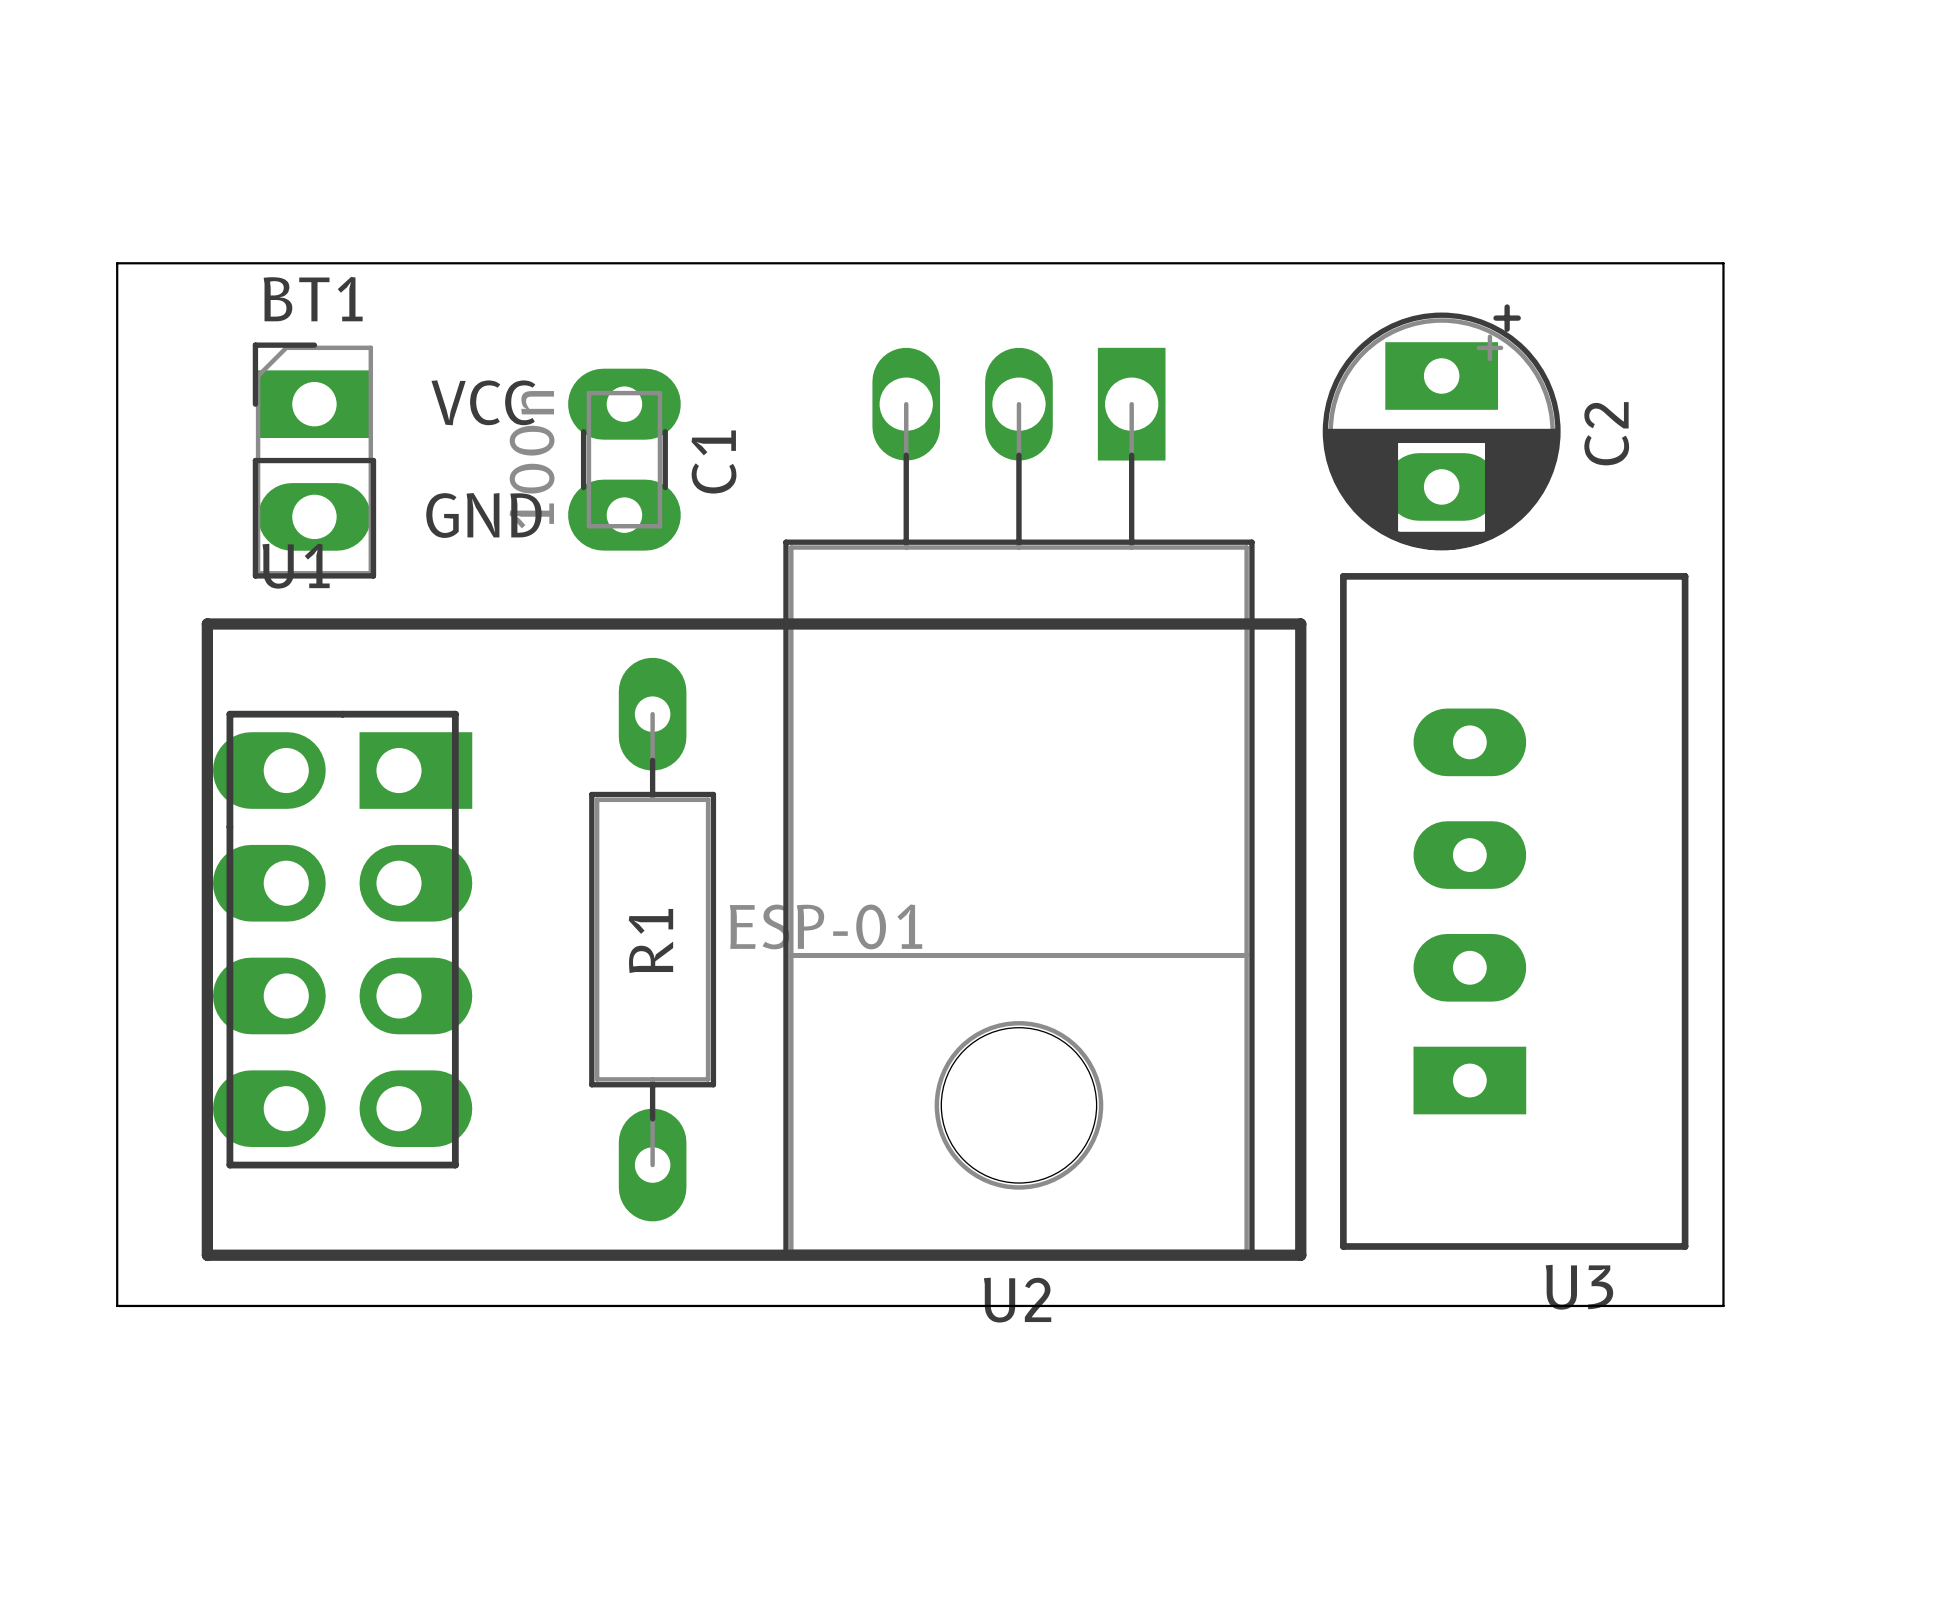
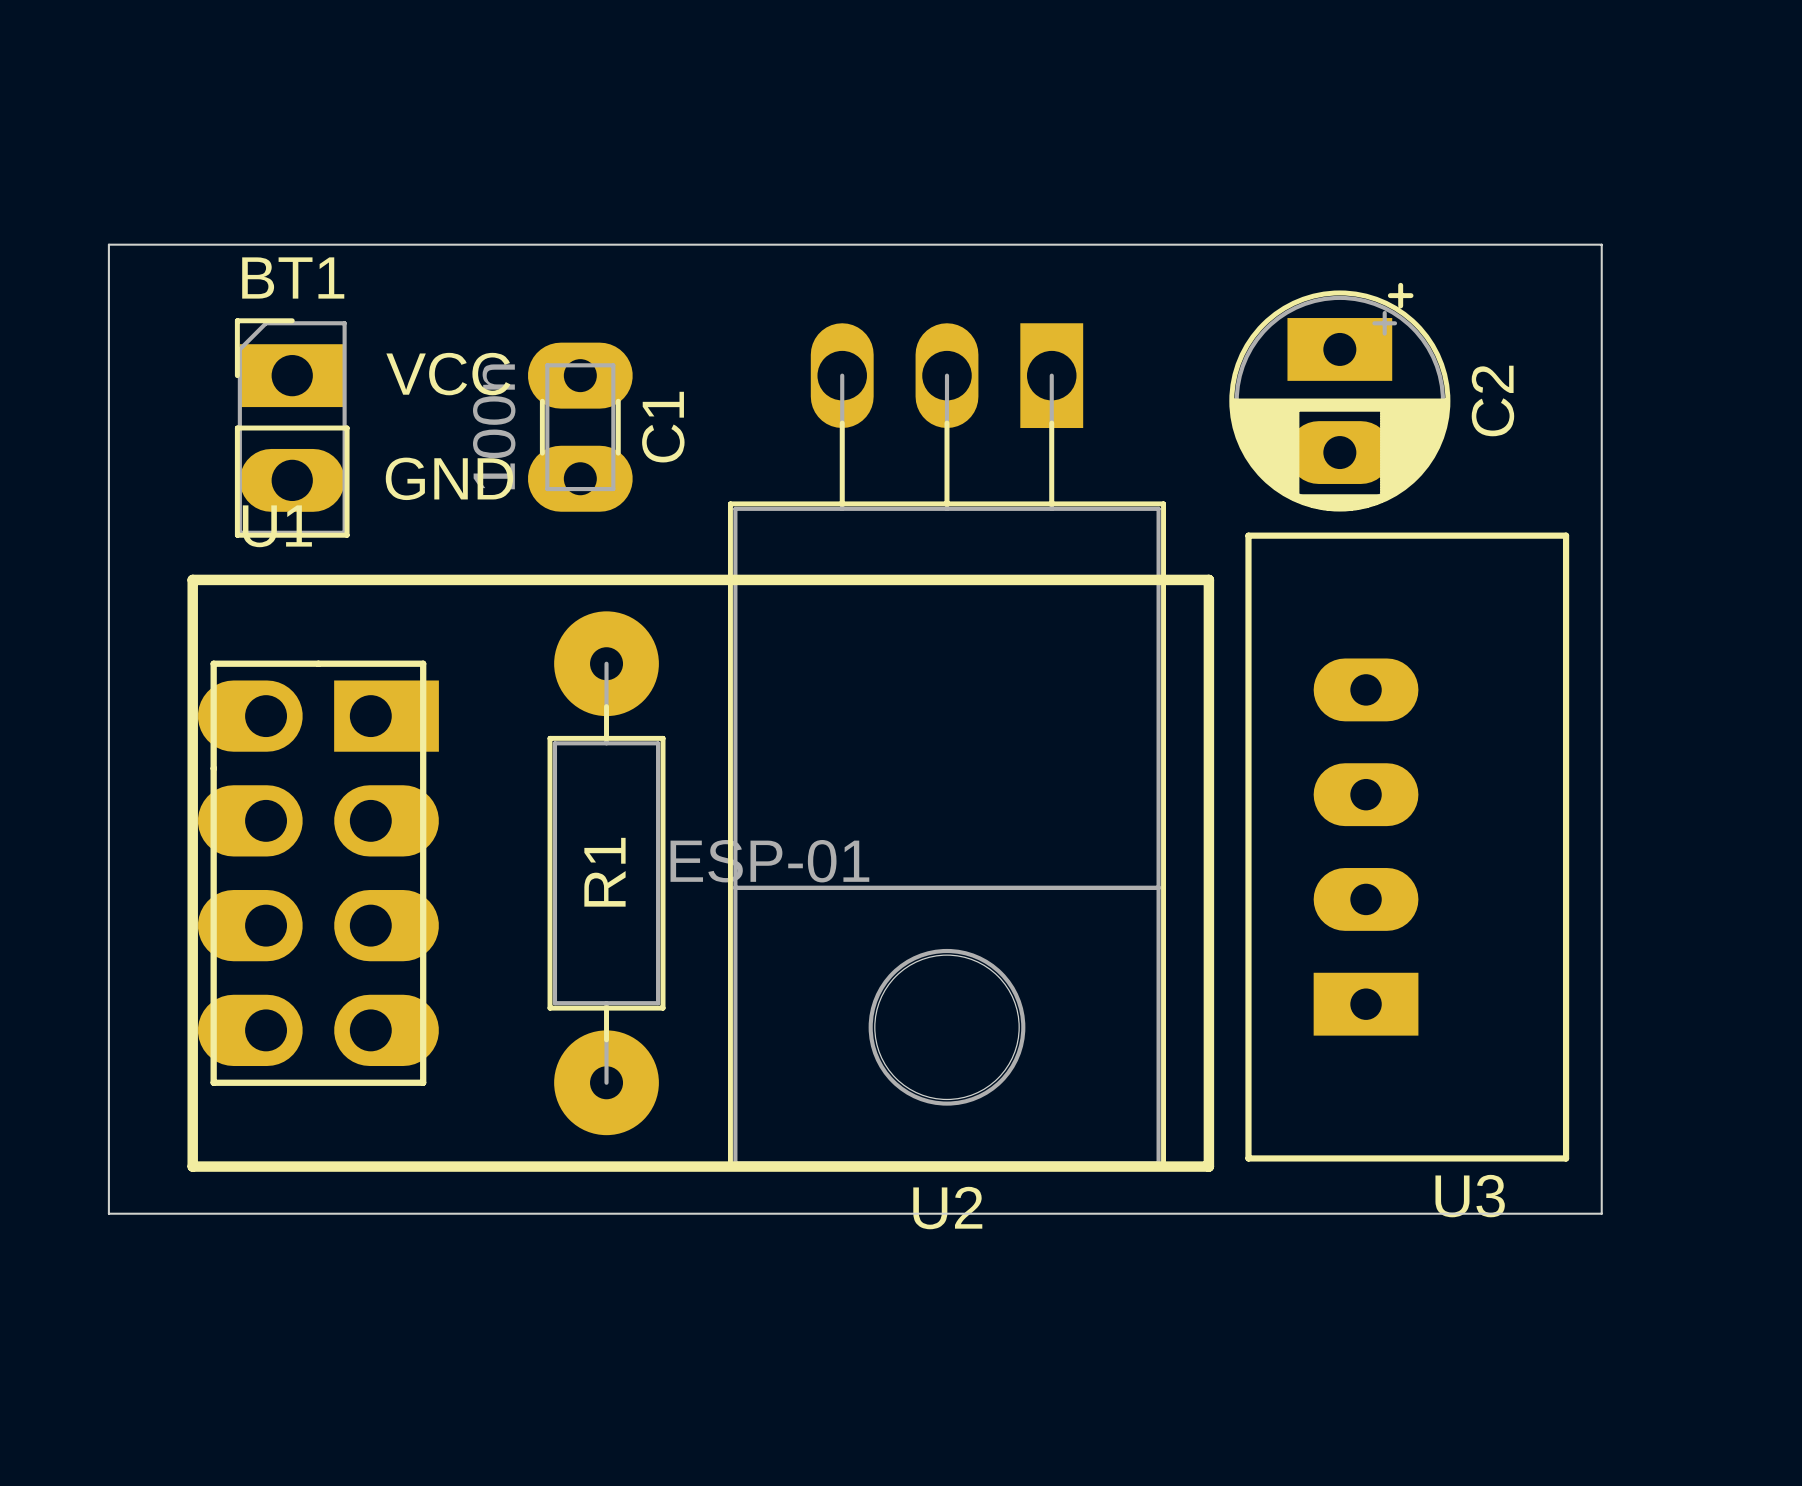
R1 footprint: [589, 657, 717, 1222] -> [547, 611, 666, 1136]

